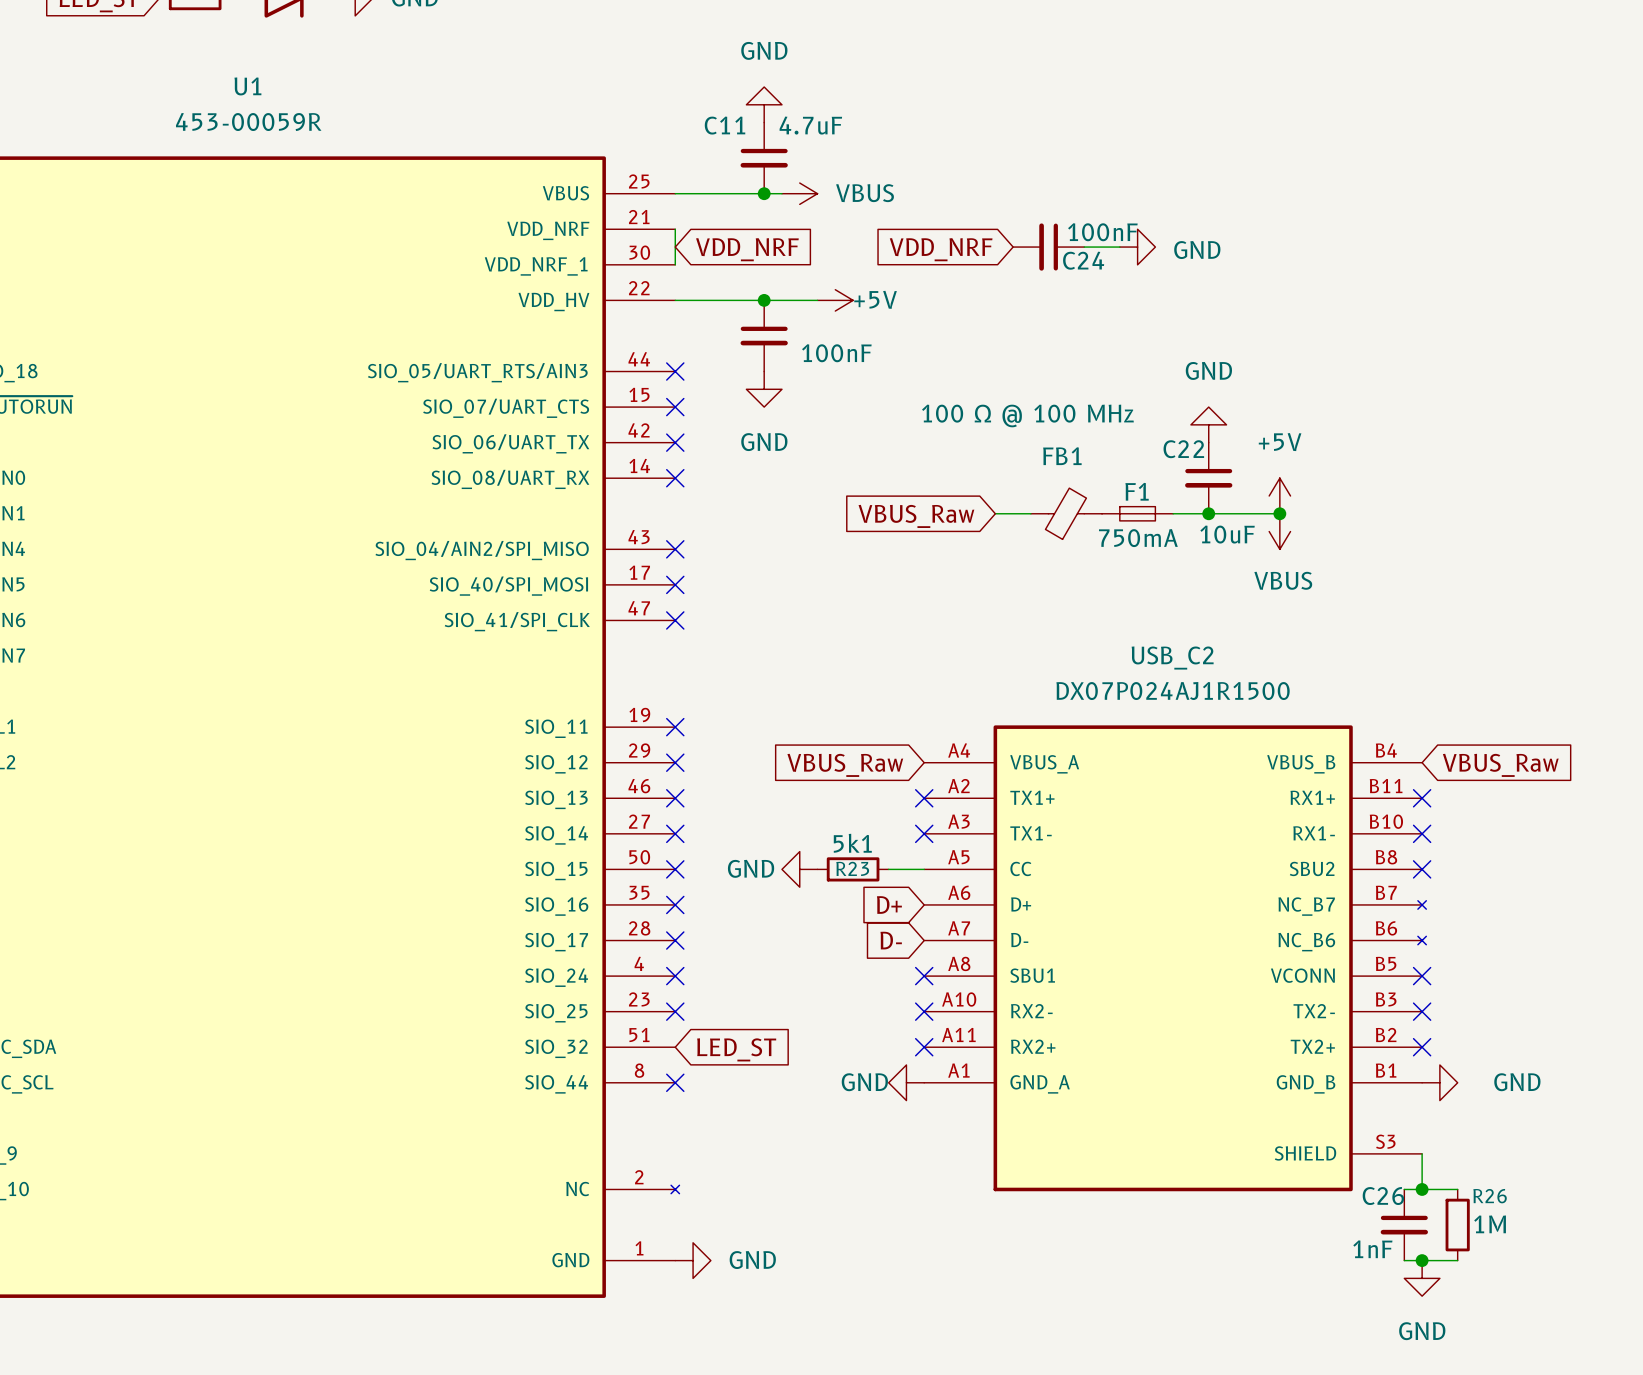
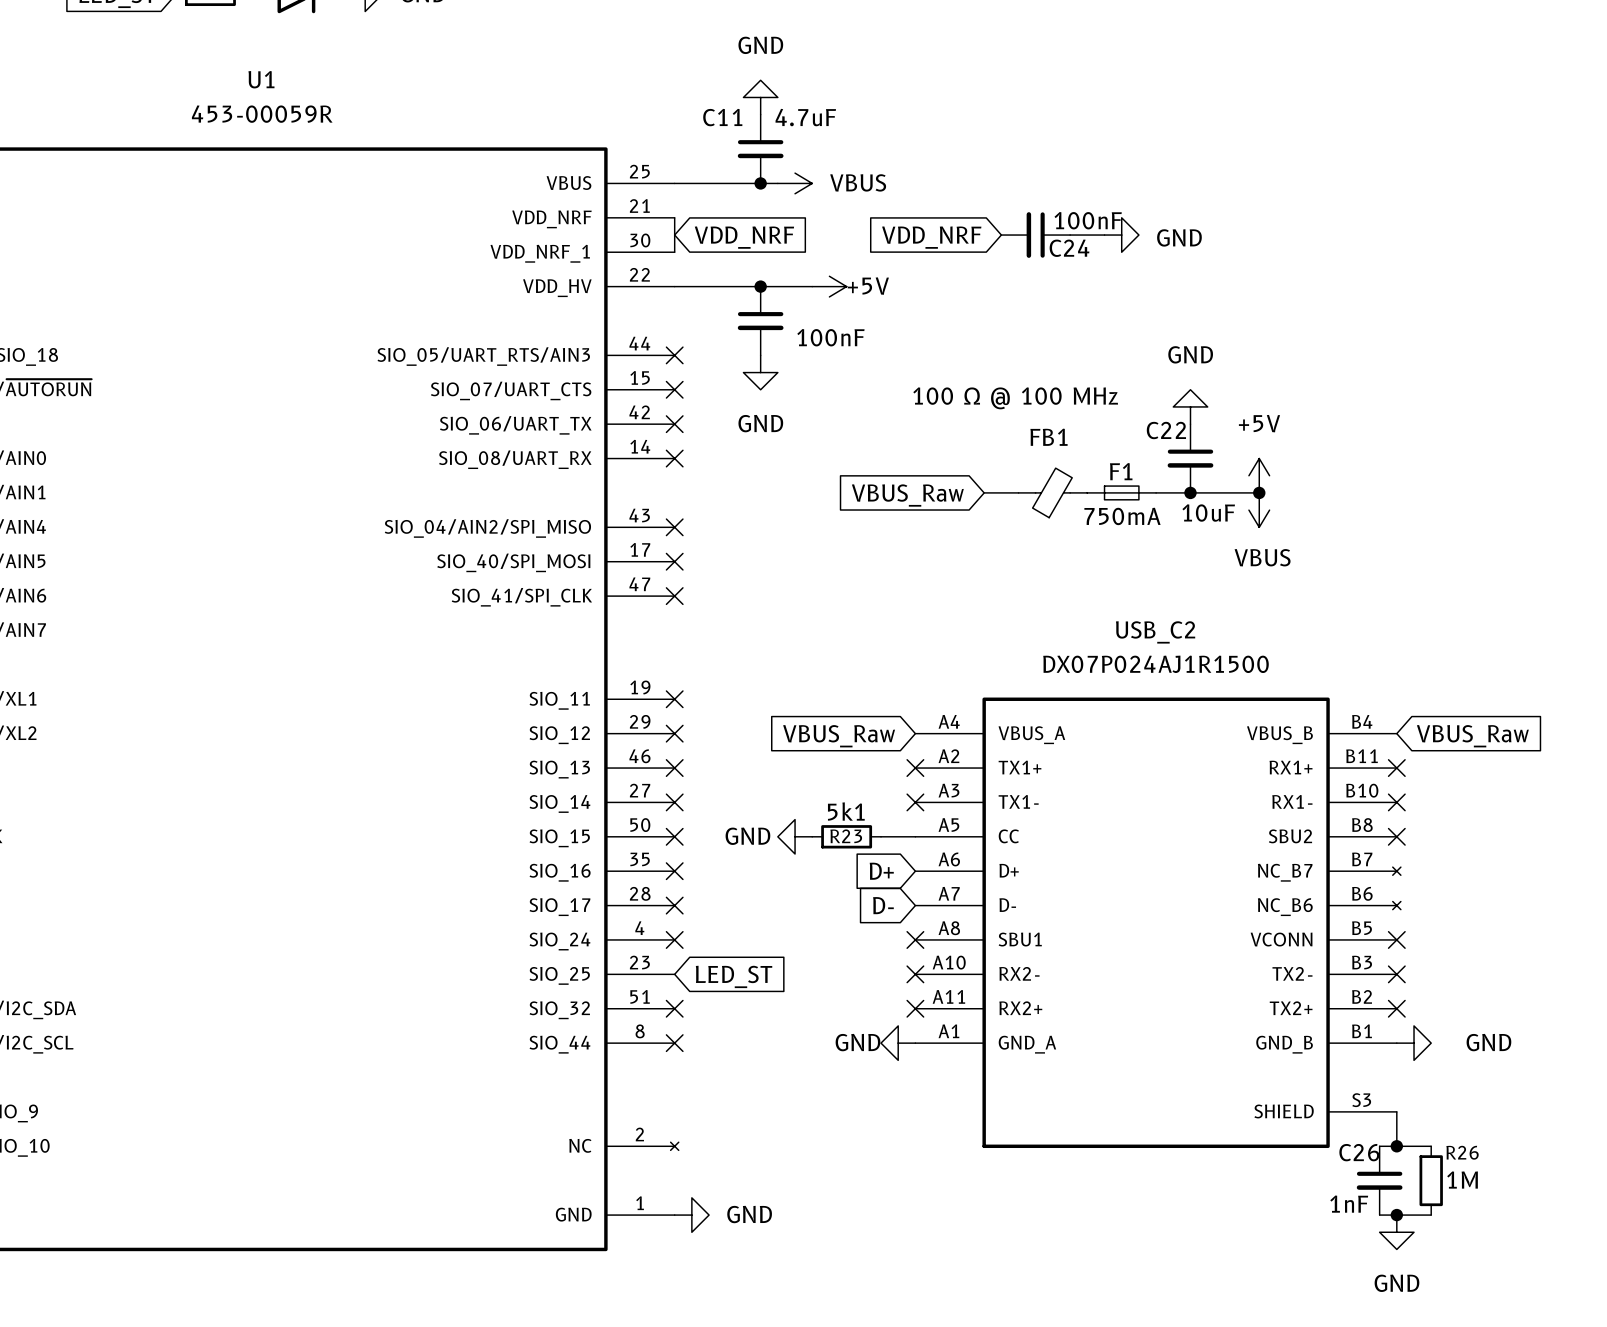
no-connect mark position: (675, 1011) -> (674, 1008)
global label position: LED_ST (736, 1049) -> LED_ST (734, 976)

